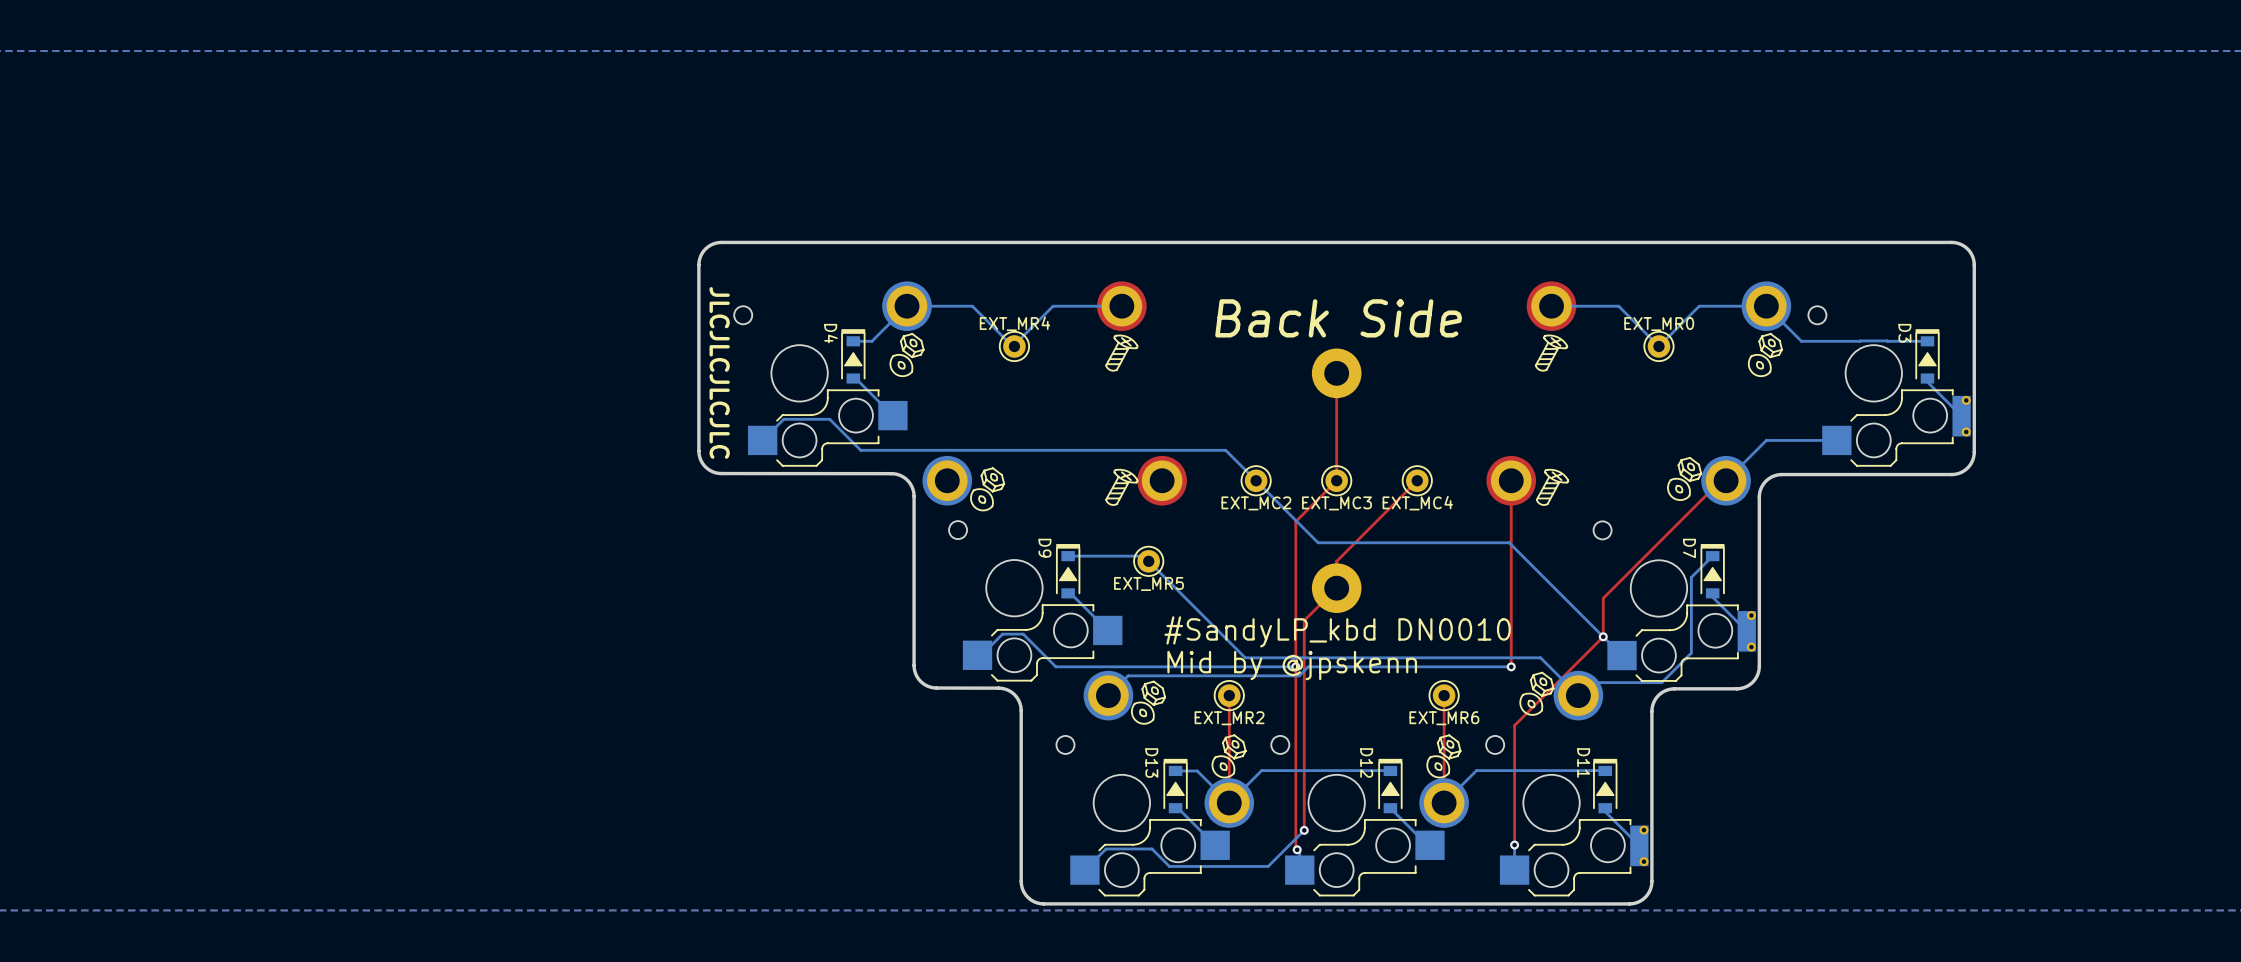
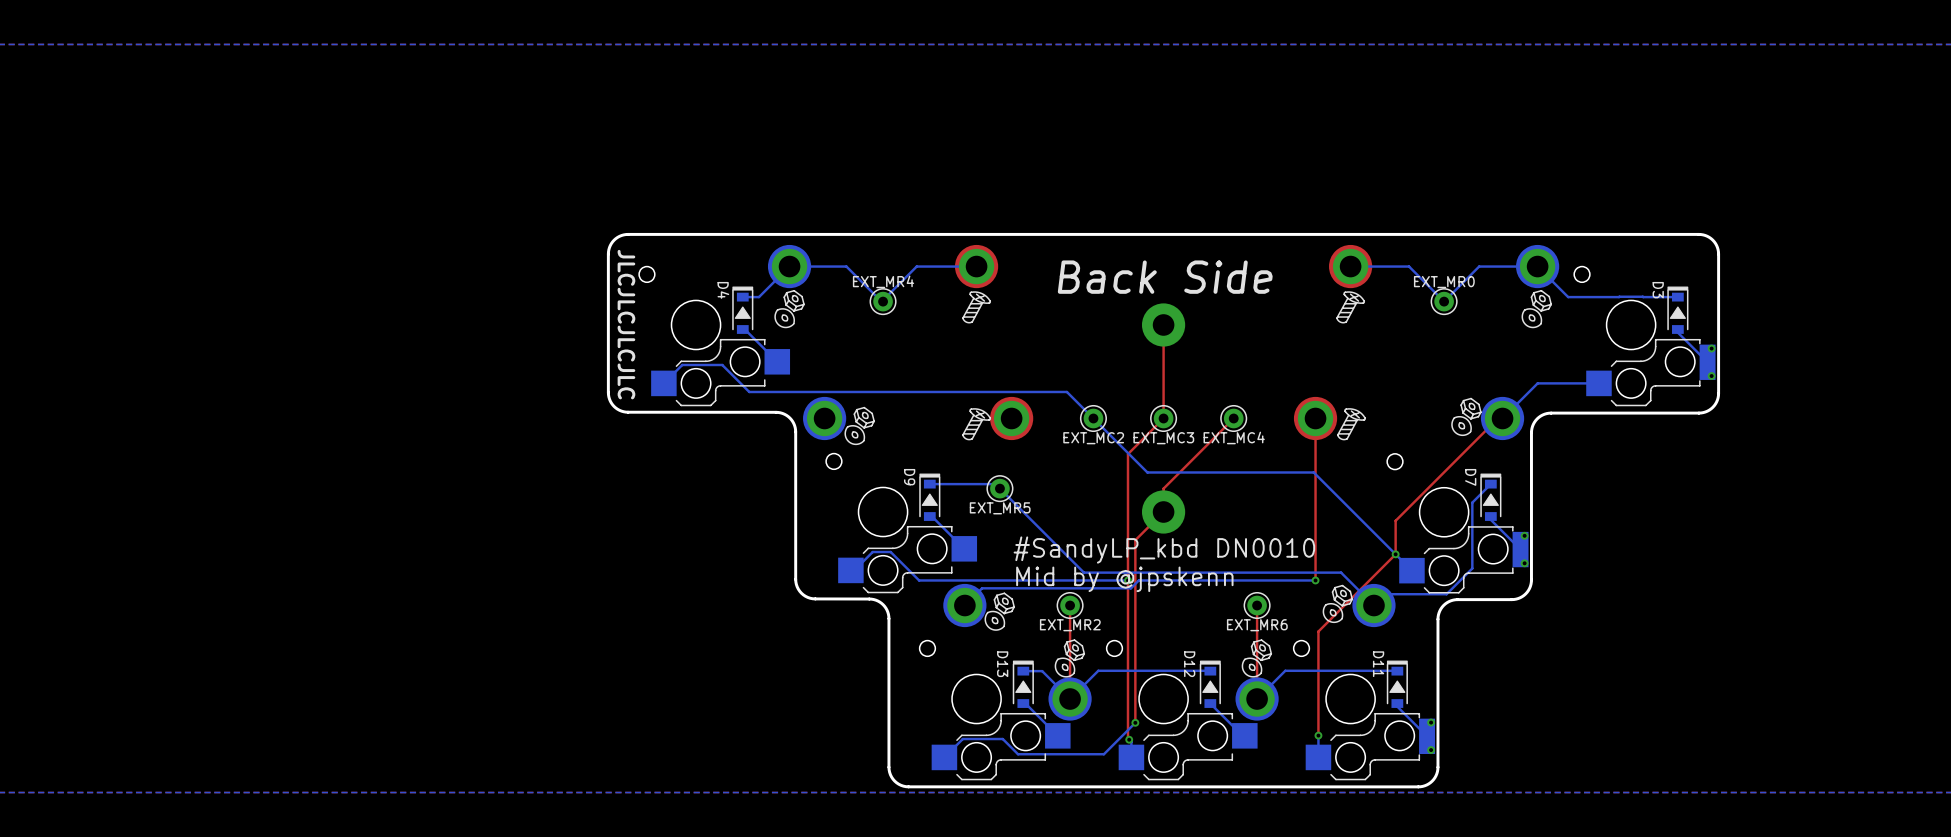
drawing: [697, 240, 1976, 906] -> none
drawing: none -> [606, 232, 1721, 789]

